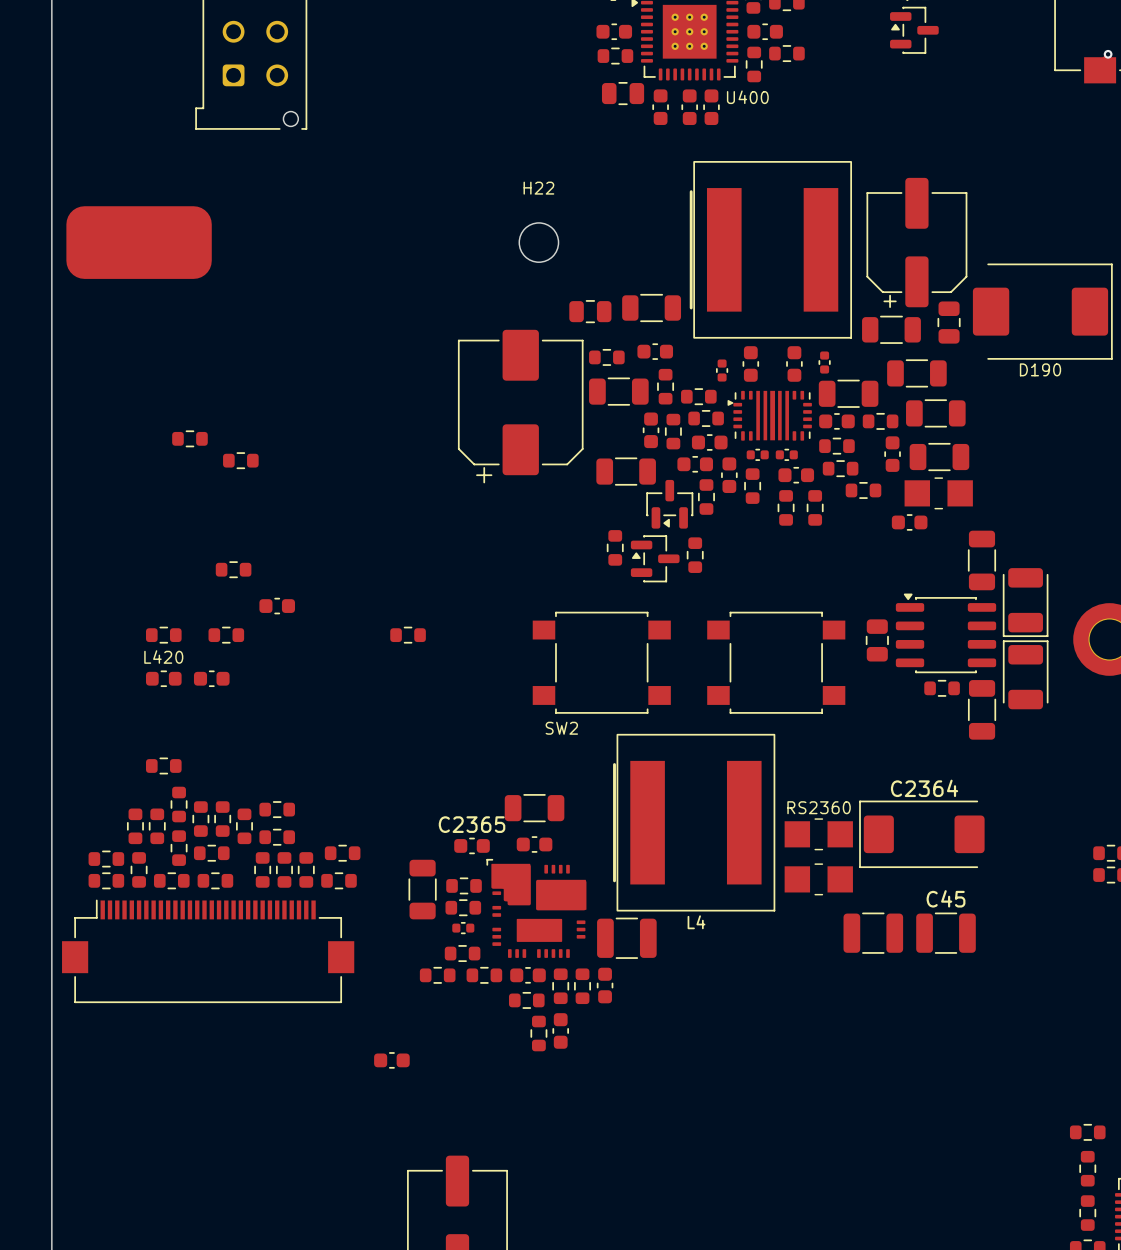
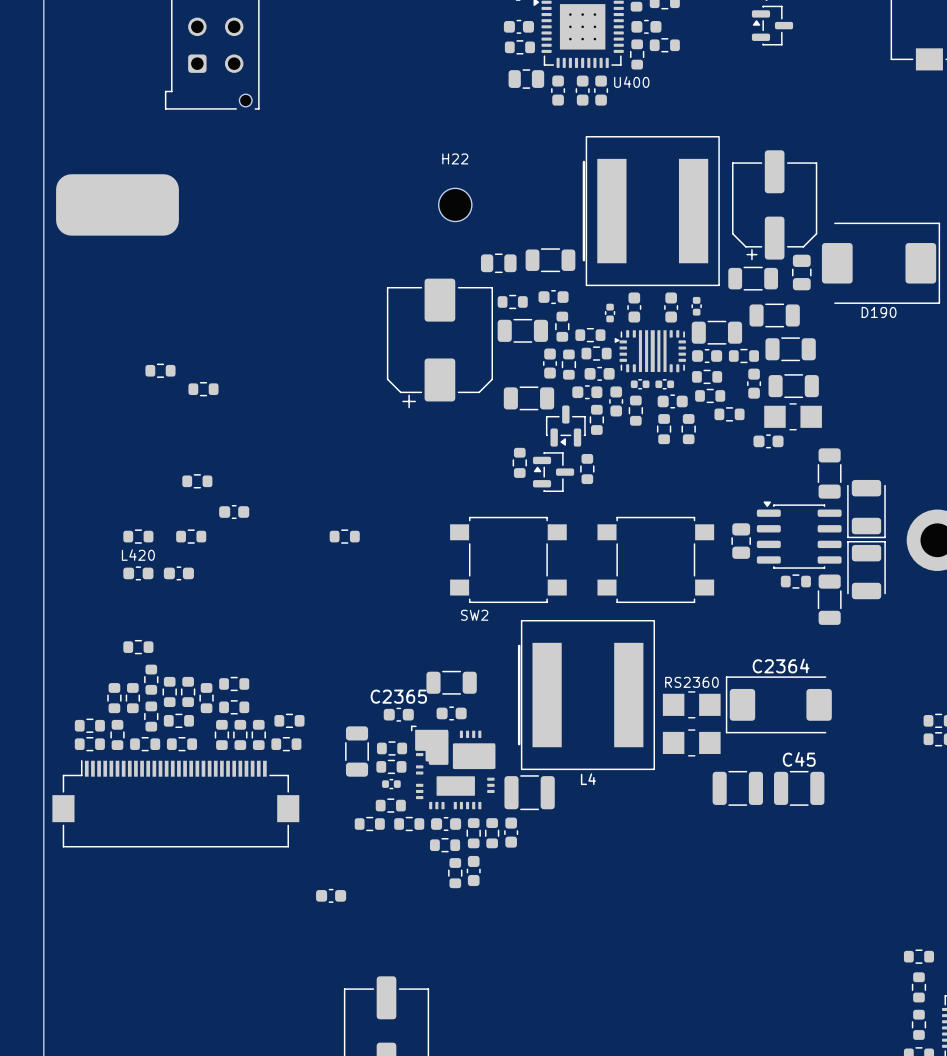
via: (1108, 54) -> none

